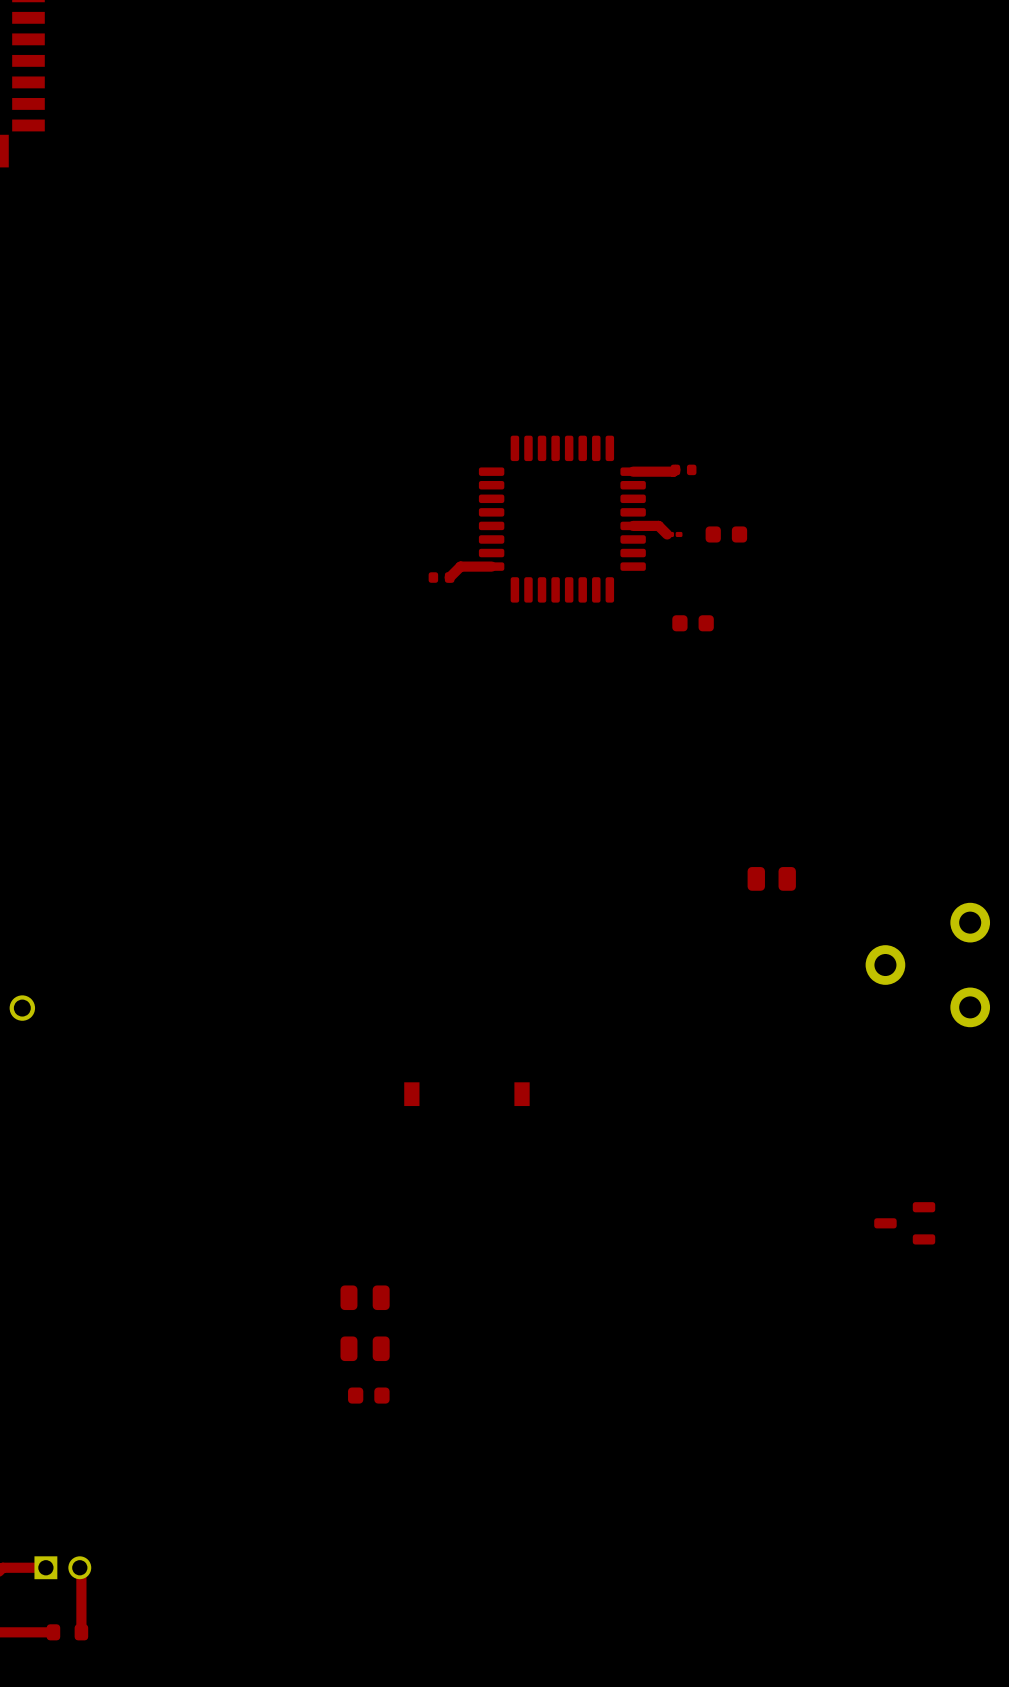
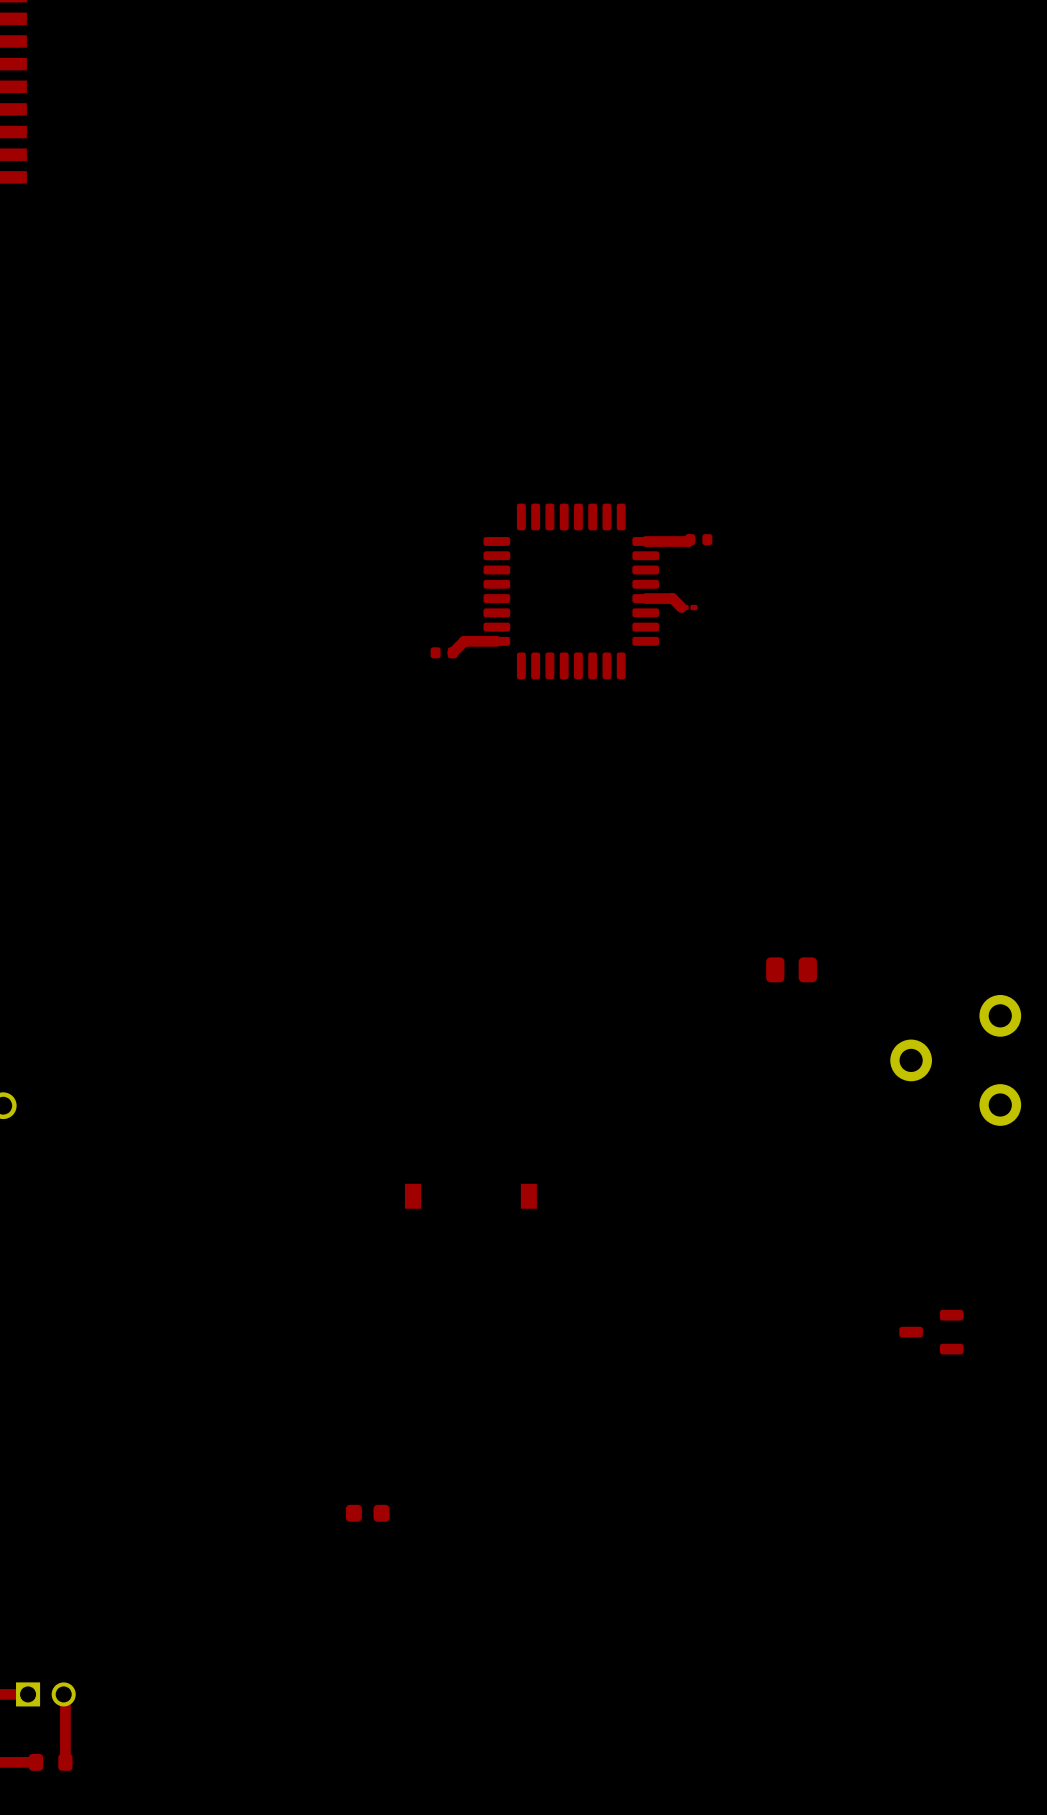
part: (726, 534) -> none
part: (693, 623) -> none
part: (365, 1297) -> none
part: (365, 1348) -> none

